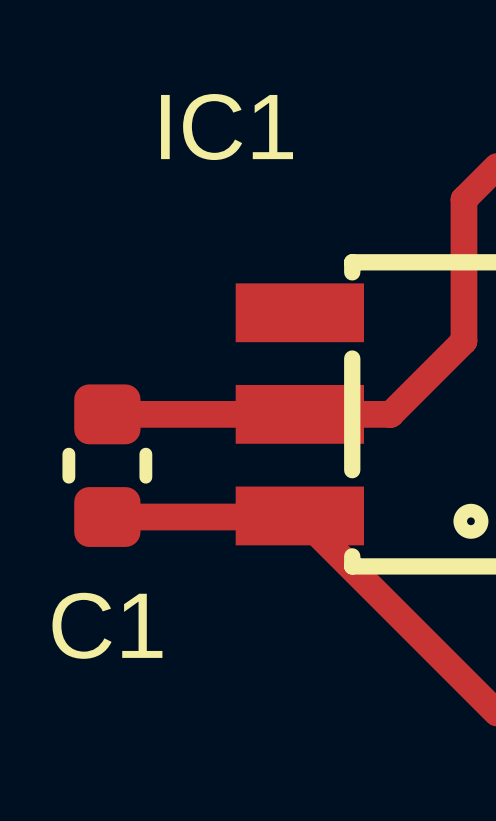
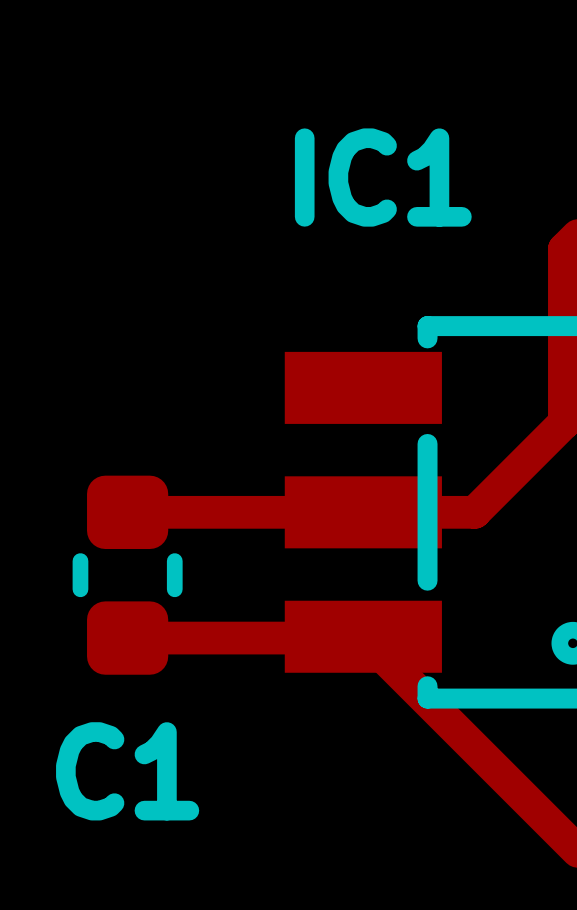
IC1 name position: IC1 (227, 127) -> IC1 (383, 177)

